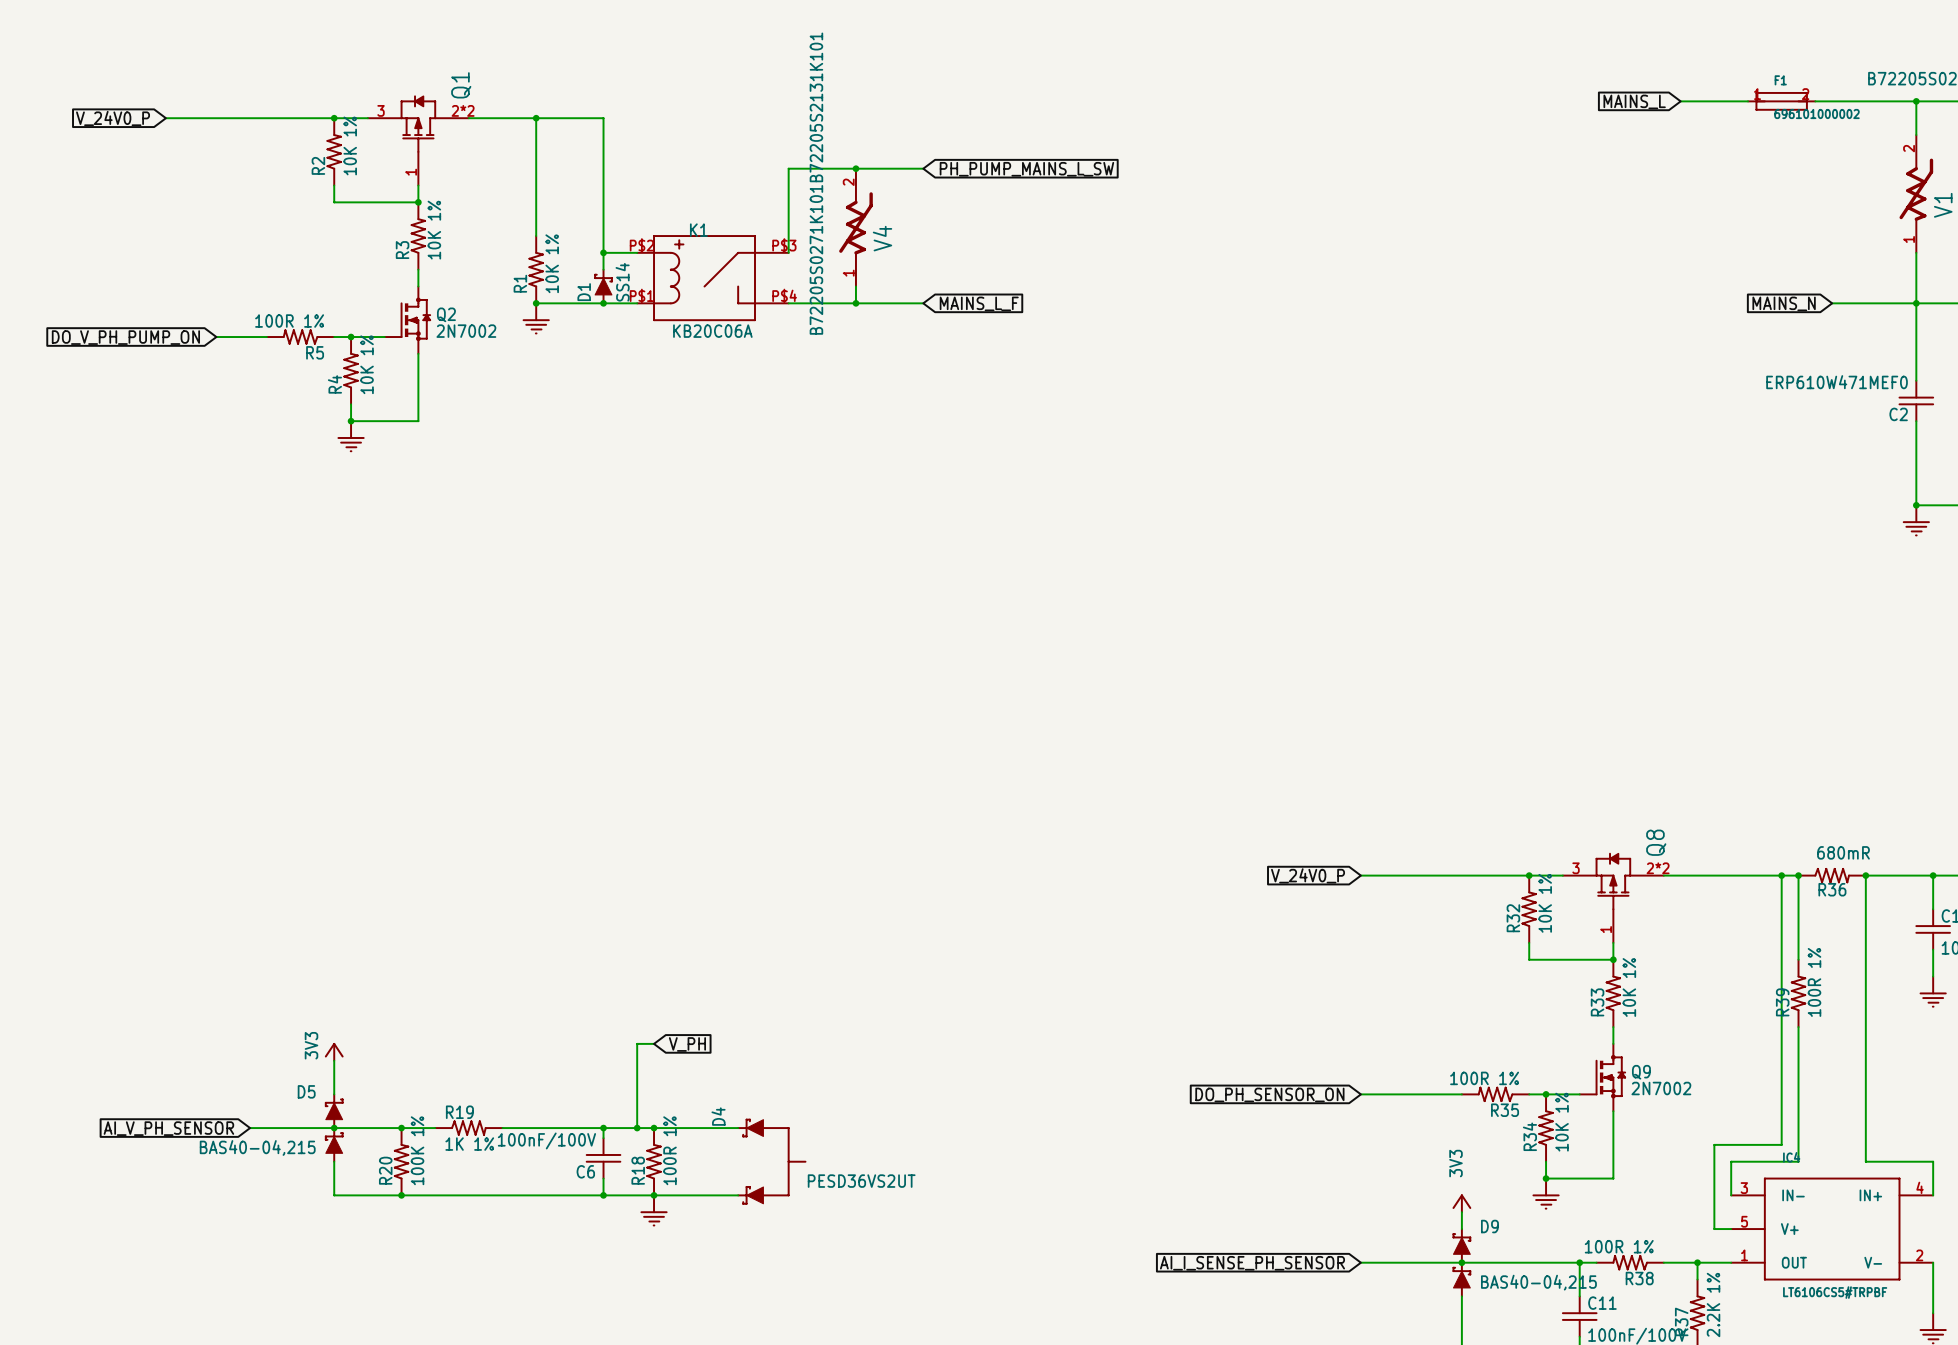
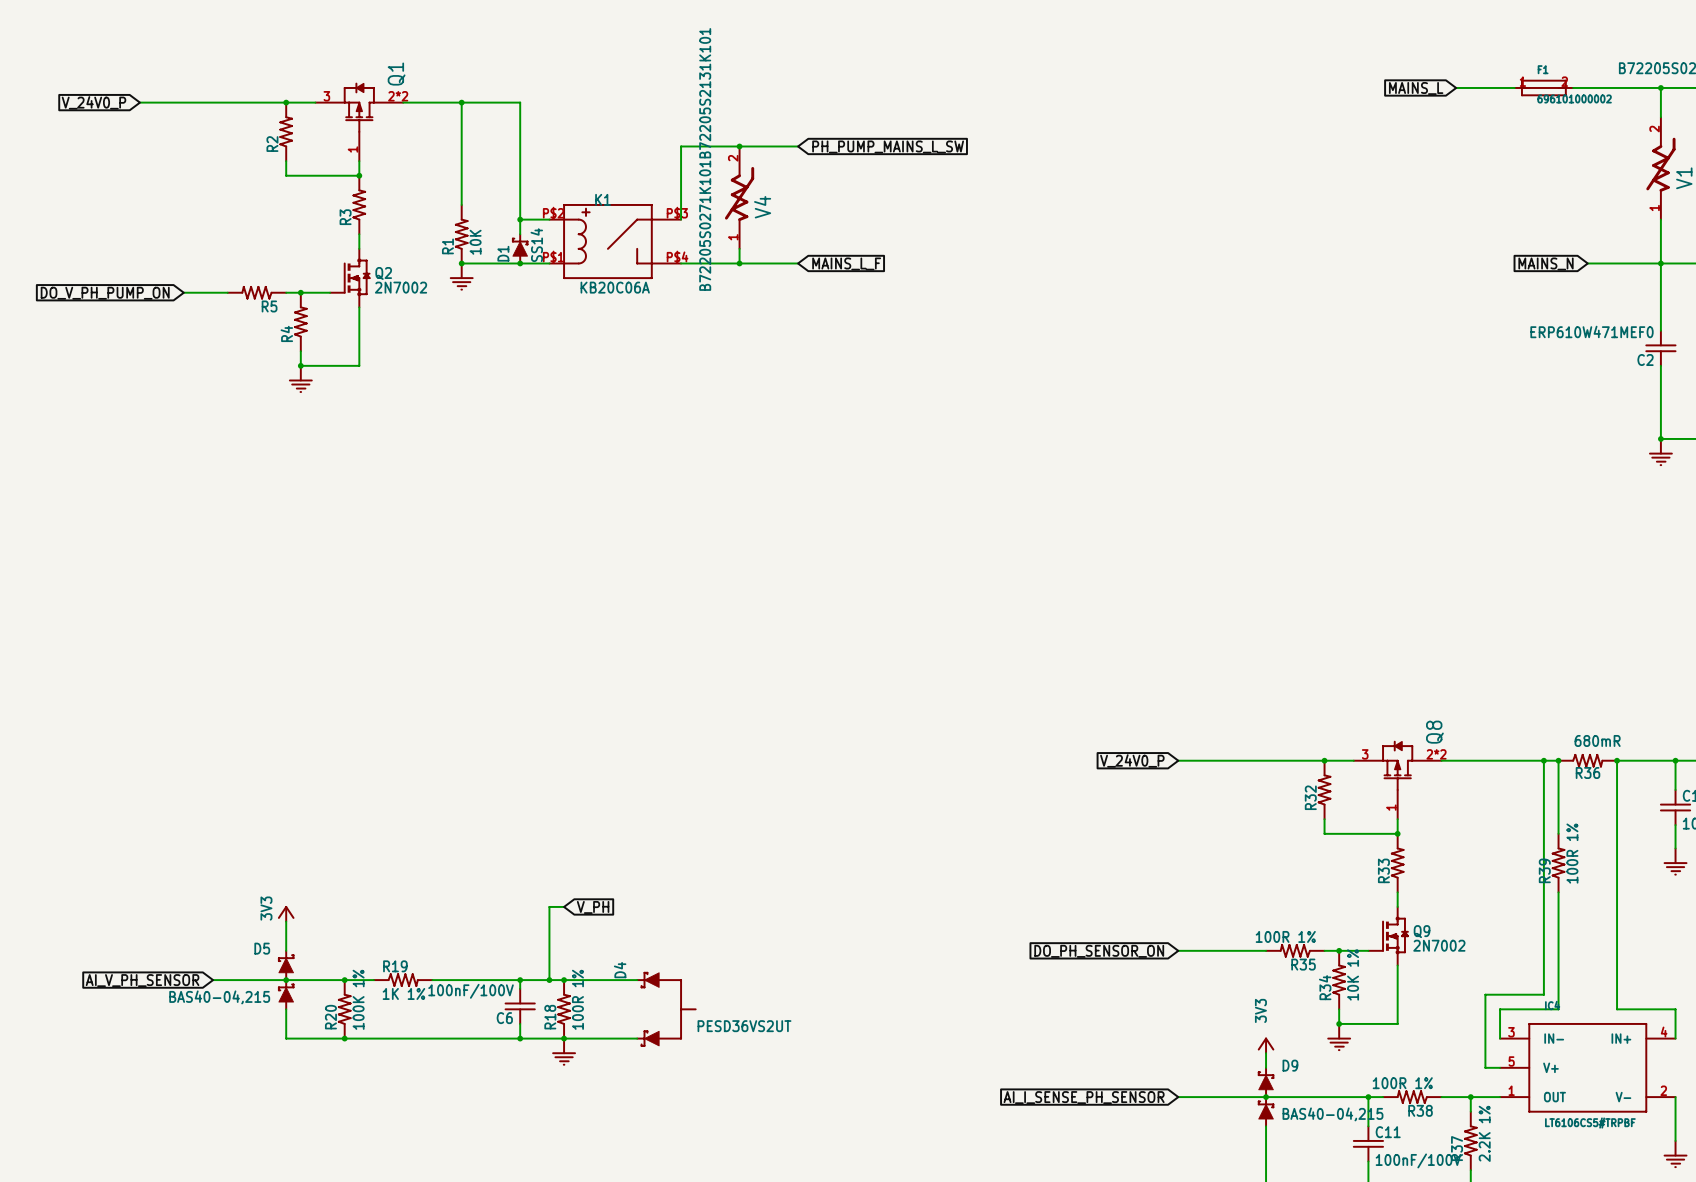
R2 value: 10K 1% (350, 145) -> none
R3 value: 10K 1% (434, 230) -> none
R1 value: 10K 1% (552, 263) -> 10K (475, 242)
R5 value: 100R 1% (289, 321) -> none
R4 value: 10K 1% (367, 364) -> none
R32 value: 10K 1% (1545, 903) -> none
R33 value: 10K 1% (1629, 987) -> none

